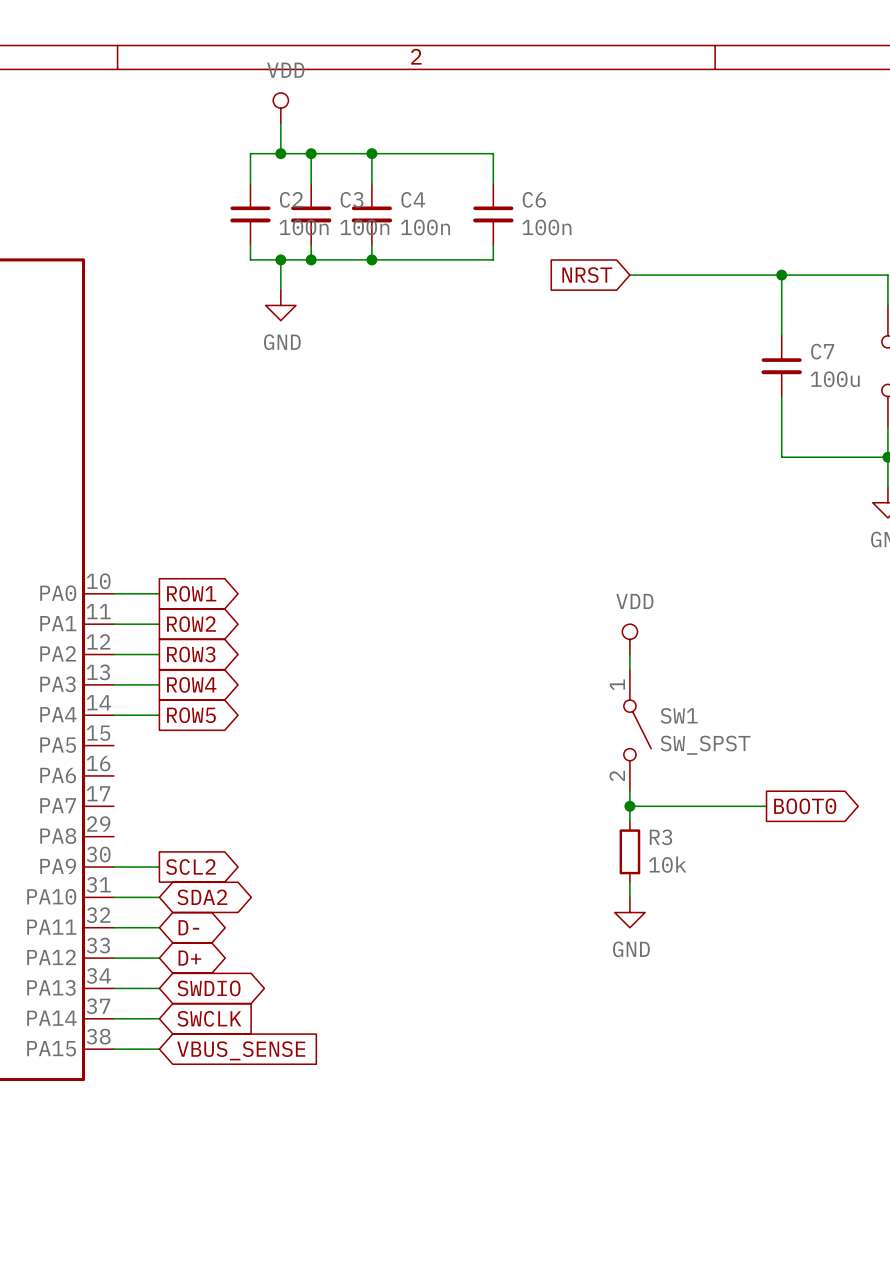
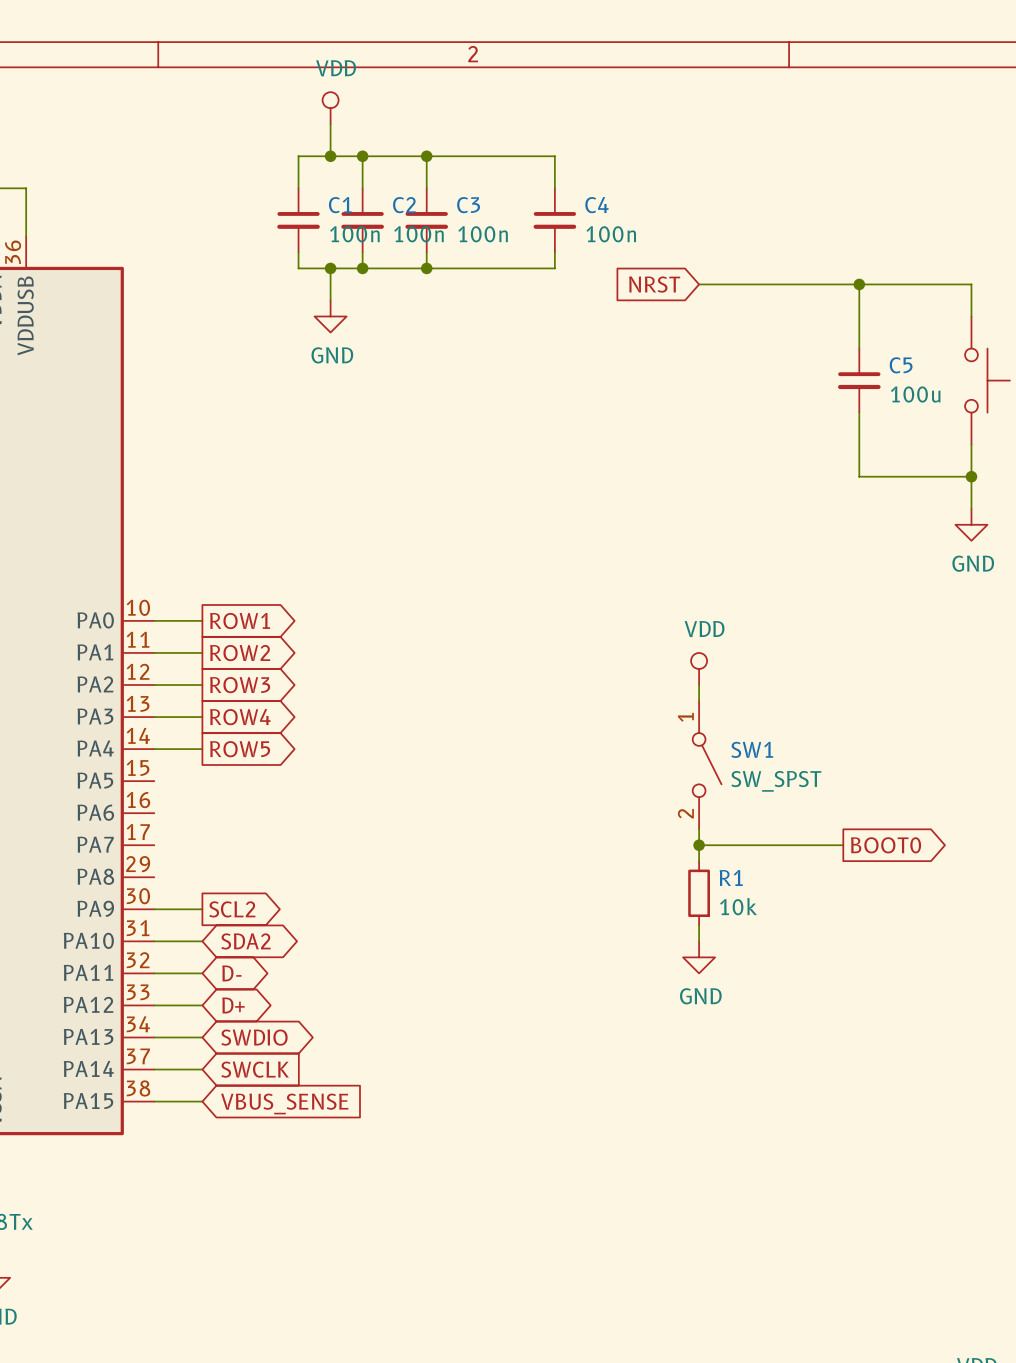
C2 name: C2 (291, 199) -> C1 (340, 205)
C3 name: C3 (352, 199) -> C2 (404, 205)
C4 name: C4 (413, 199) -> C3 (468, 205)
C6 name: C6 (534, 199) -> C4 (596, 205)
C7 name: C7 (822, 351) -> C5 (901, 365)
R3 name: R3 (660, 837) -> R1 (731, 877)

